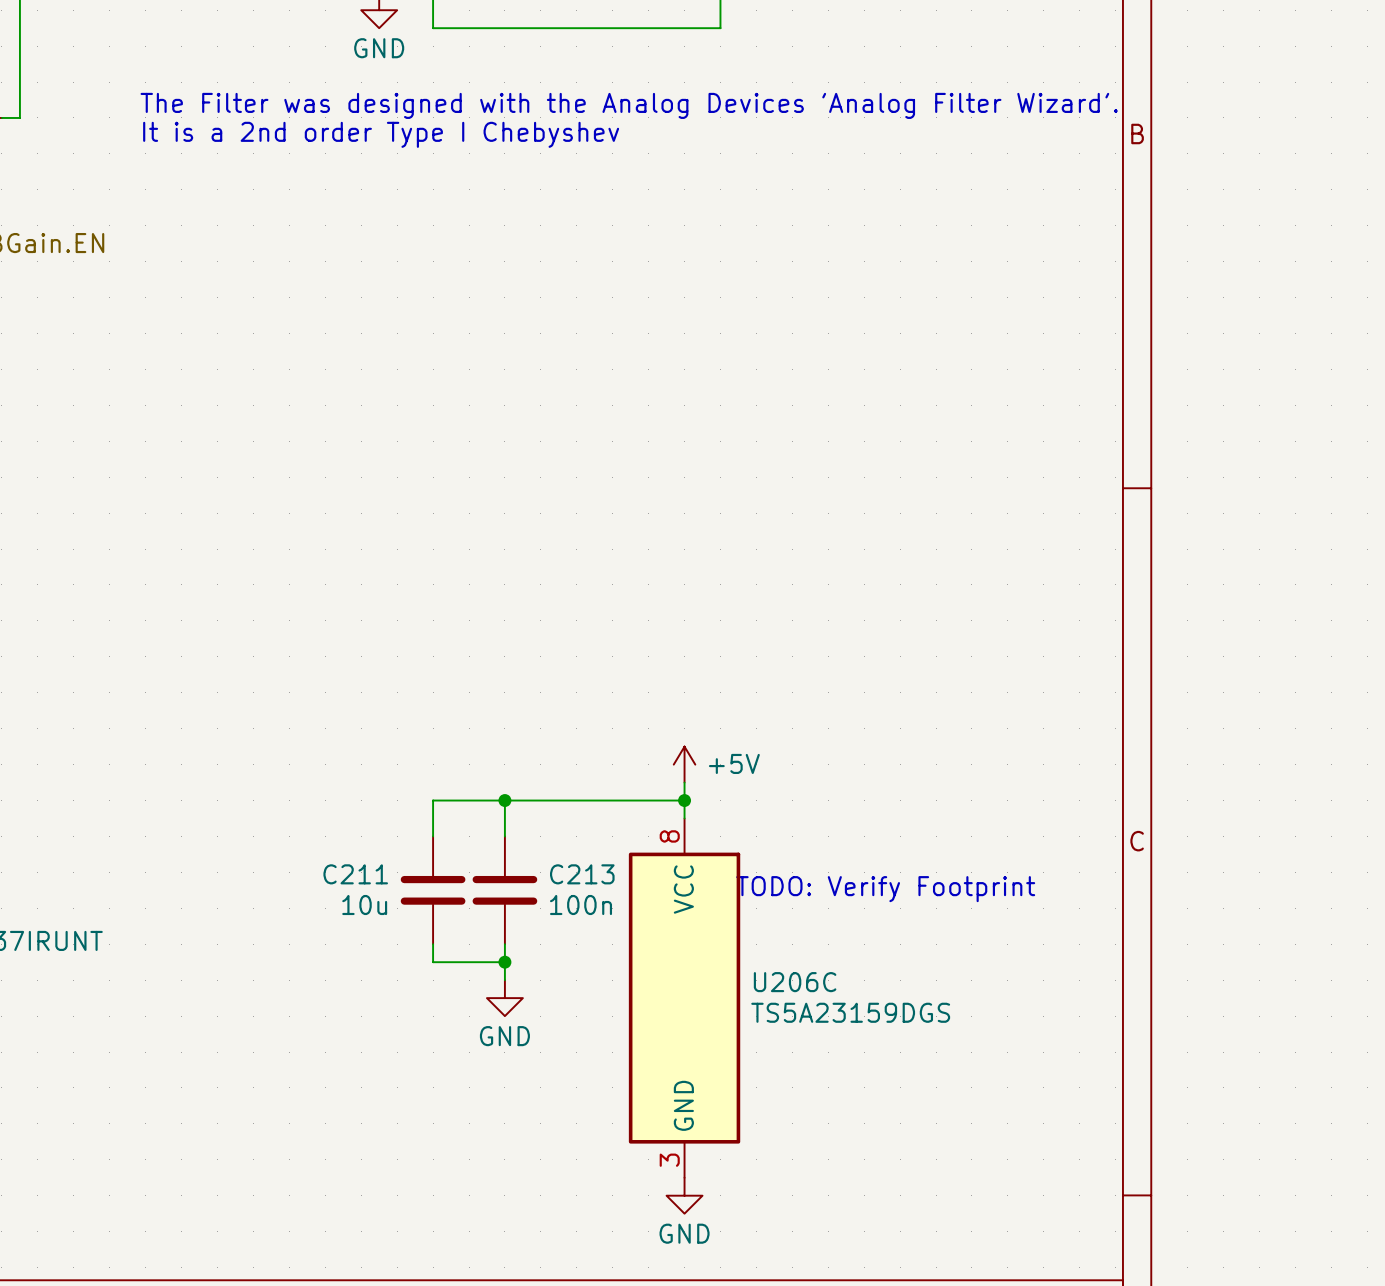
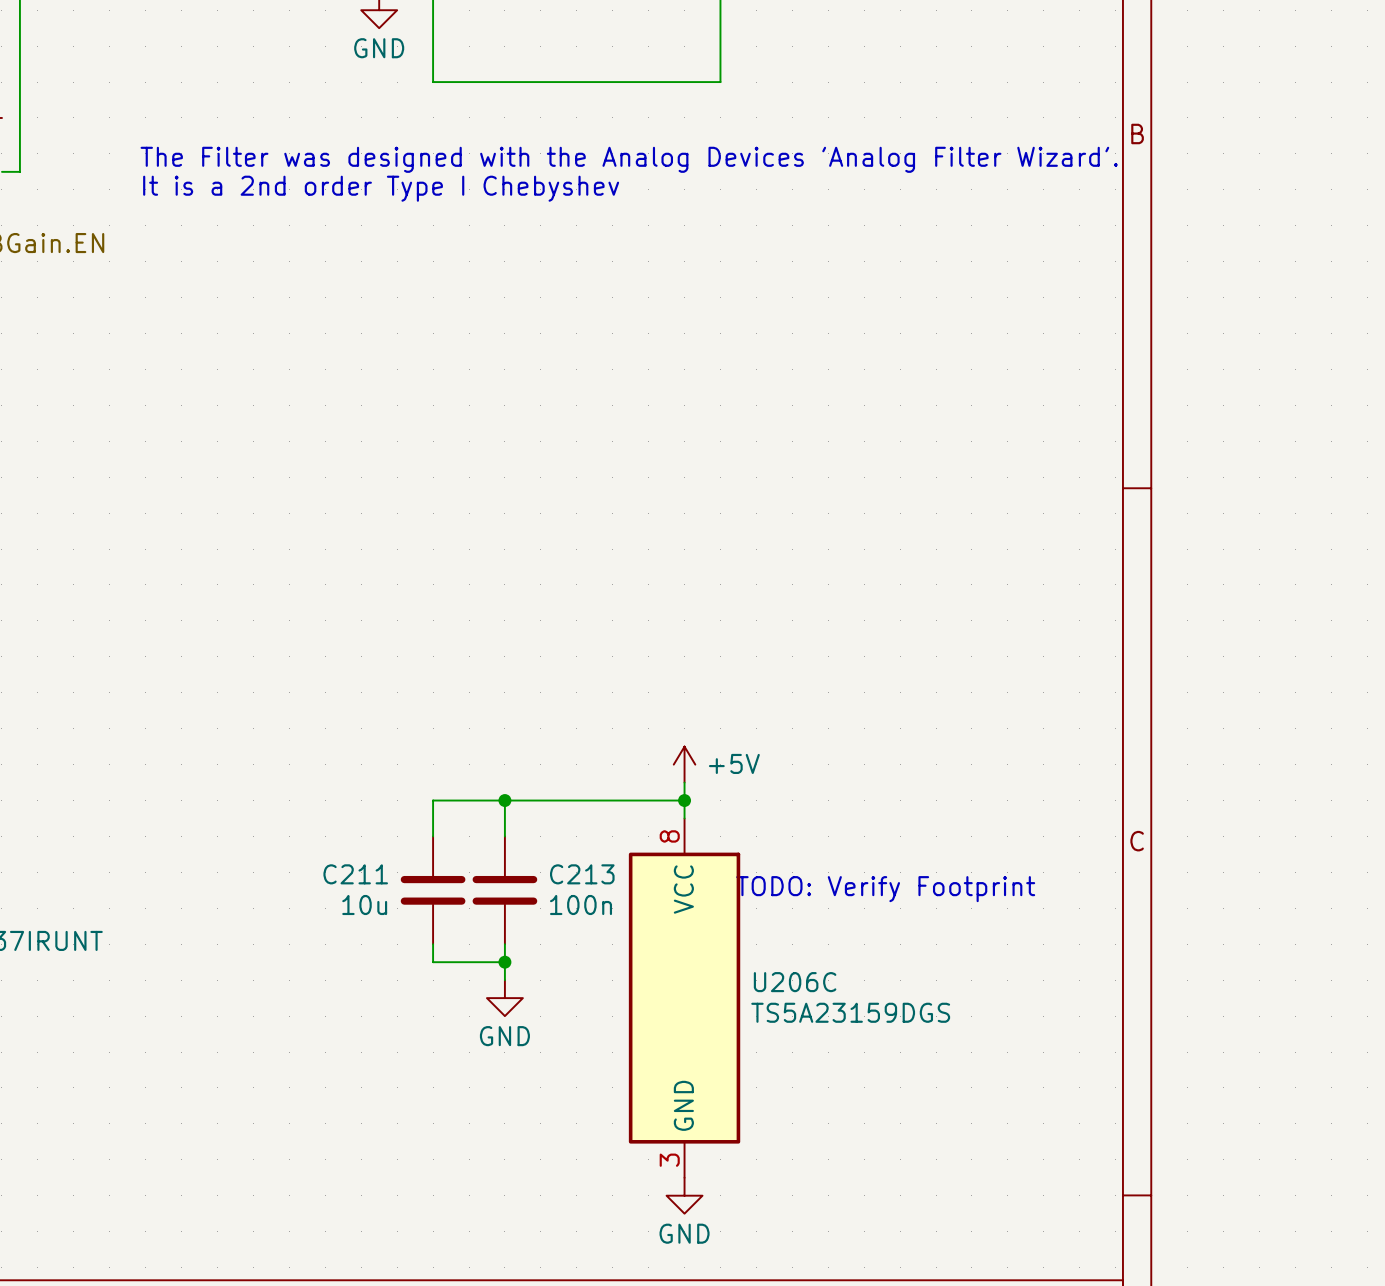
wire: (433, 28) (720, 28) -> (433, 28) (433, 82) (720, 82) (720, 28)
text position: The Filter was designed with the Analog Devices 'Analog Filter Wizard'. (629, 105) -> The Filter was designed with the Analog Devices 'Analog Filter Wizard'. (629, 159)
wire: (1, 117) (19, 117) -> (1, 171) (19, 171) (19, 117)
text position: It is a 2nd order Type I Chebyshev (381, 134) -> It is a 2nd order Type I Chebyshev (381, 188)

